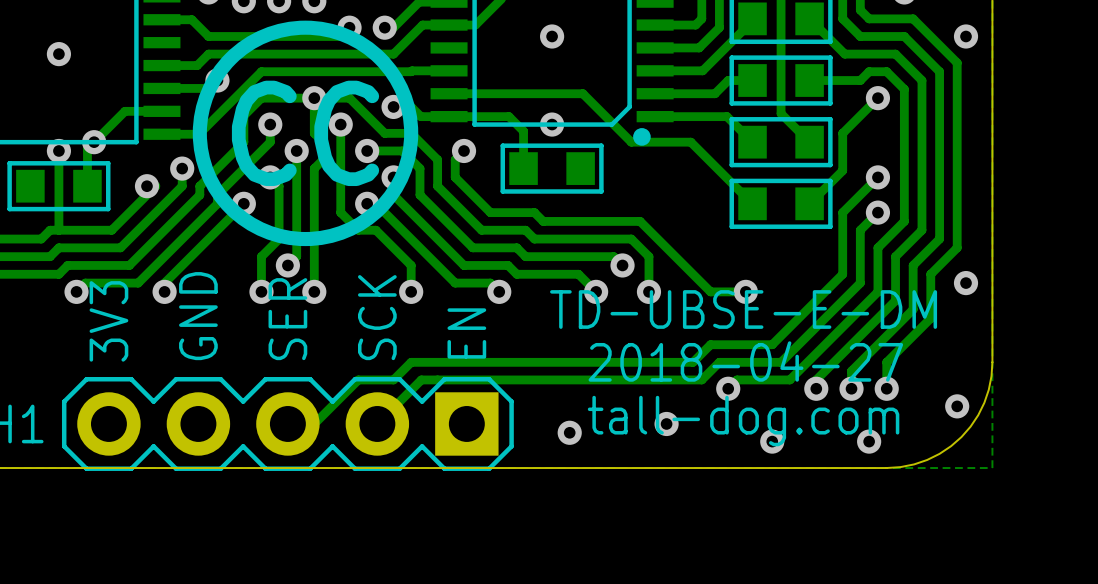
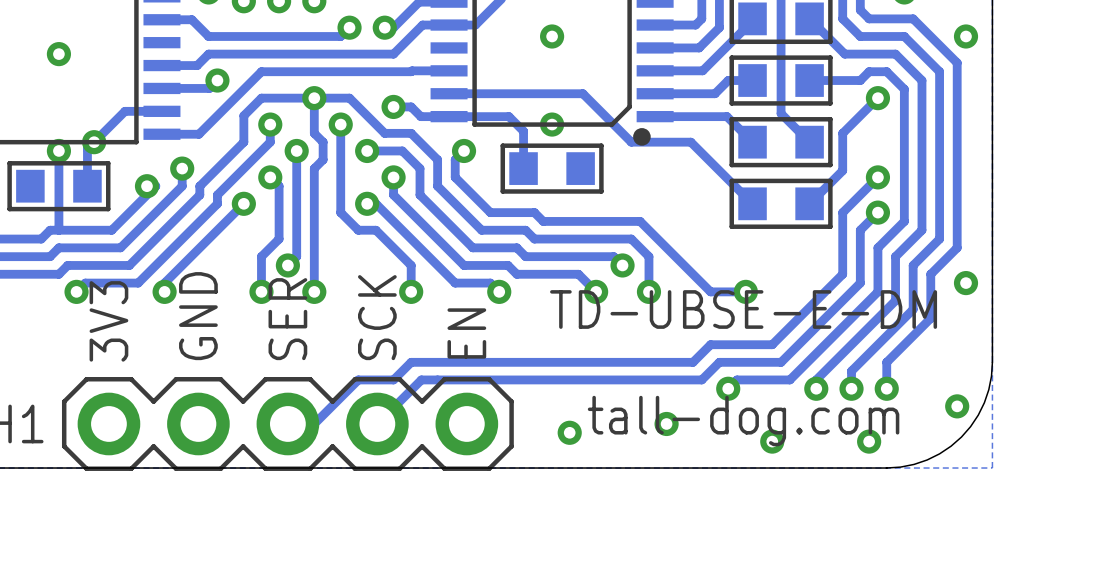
drawing: [192, 20, 419, 247] -> none
text: 2018-04-27 (745, 361) -> none
part footprint: [61, 377, 514, 471] -> [61, 377, 514, 471]

